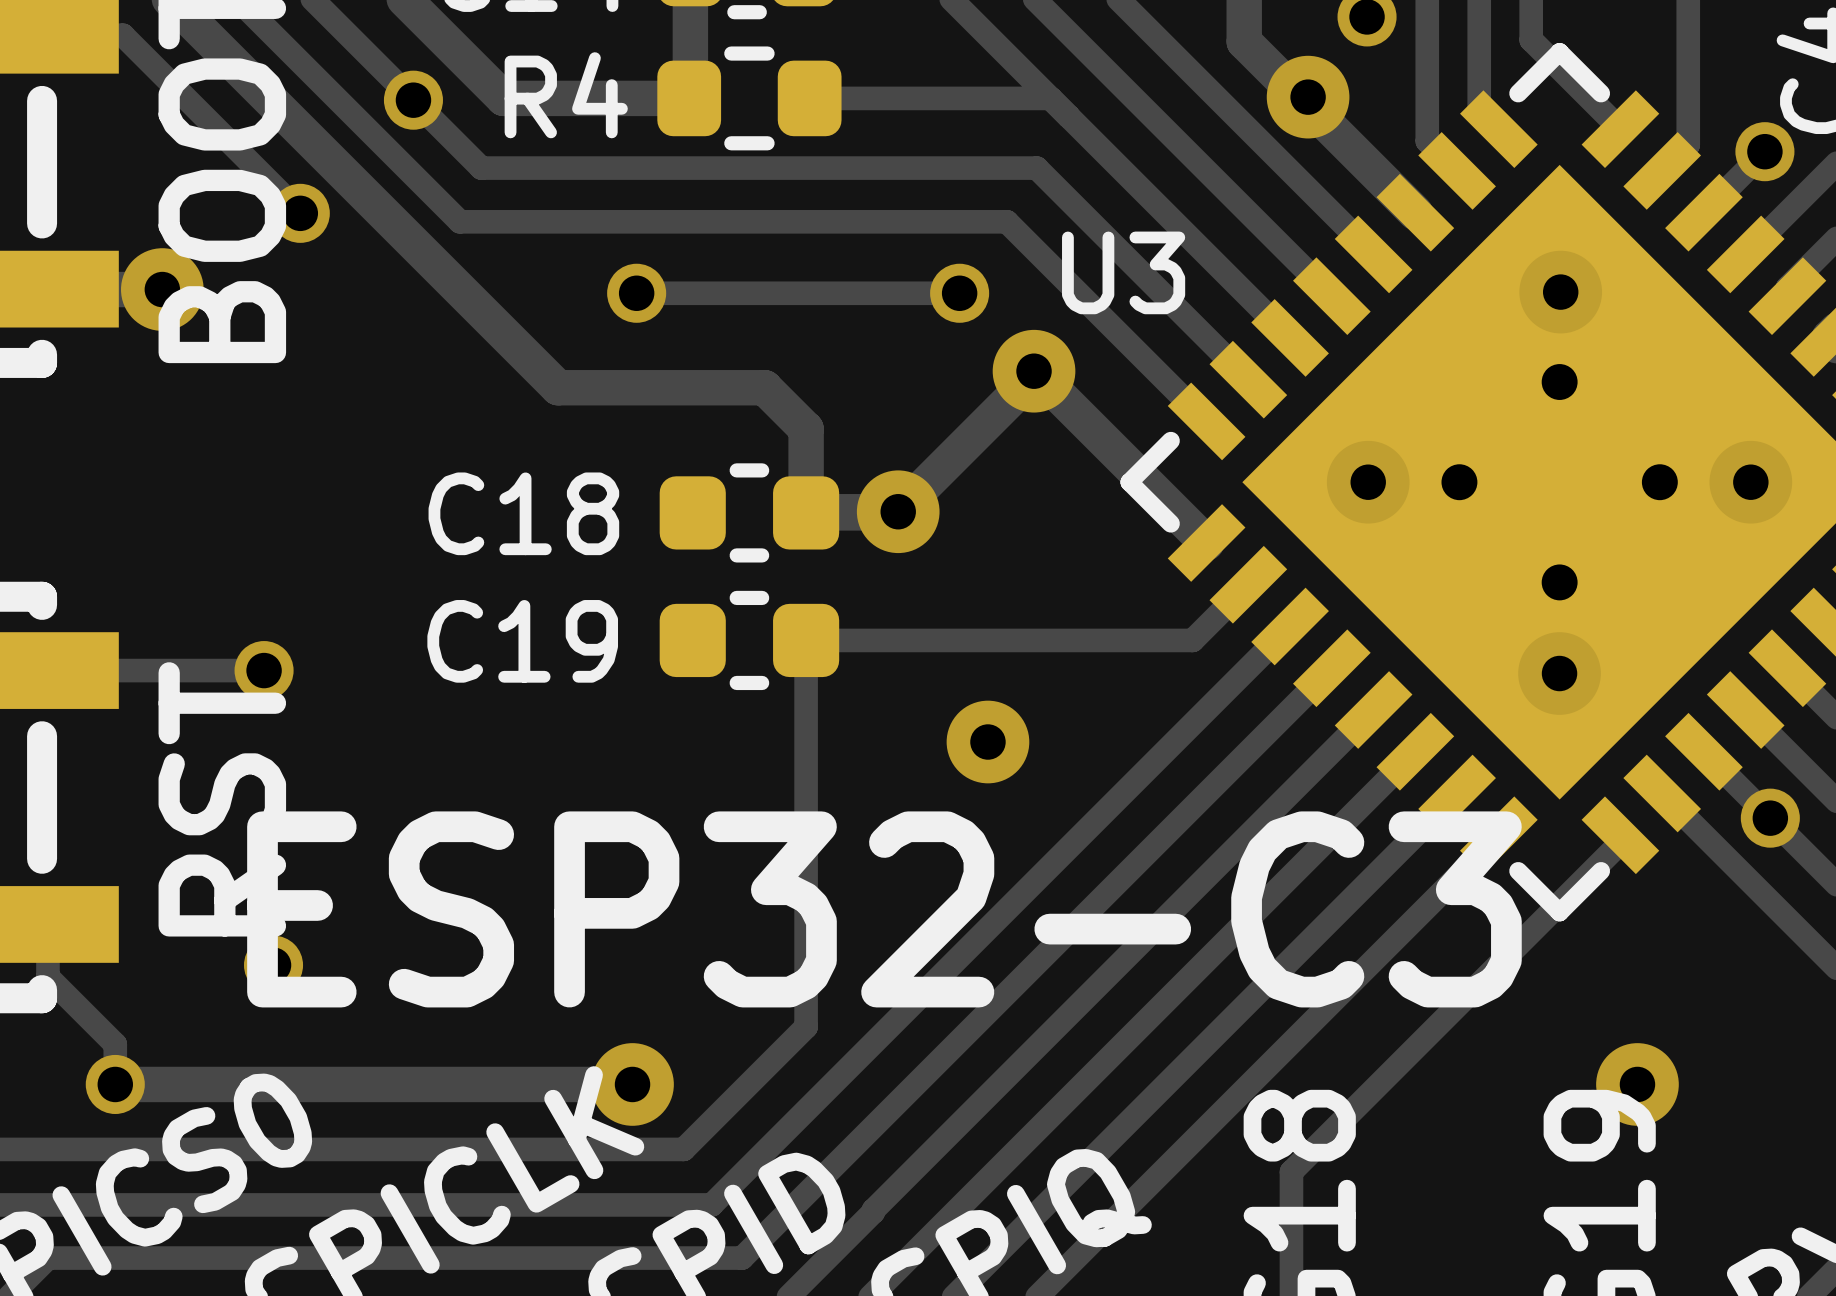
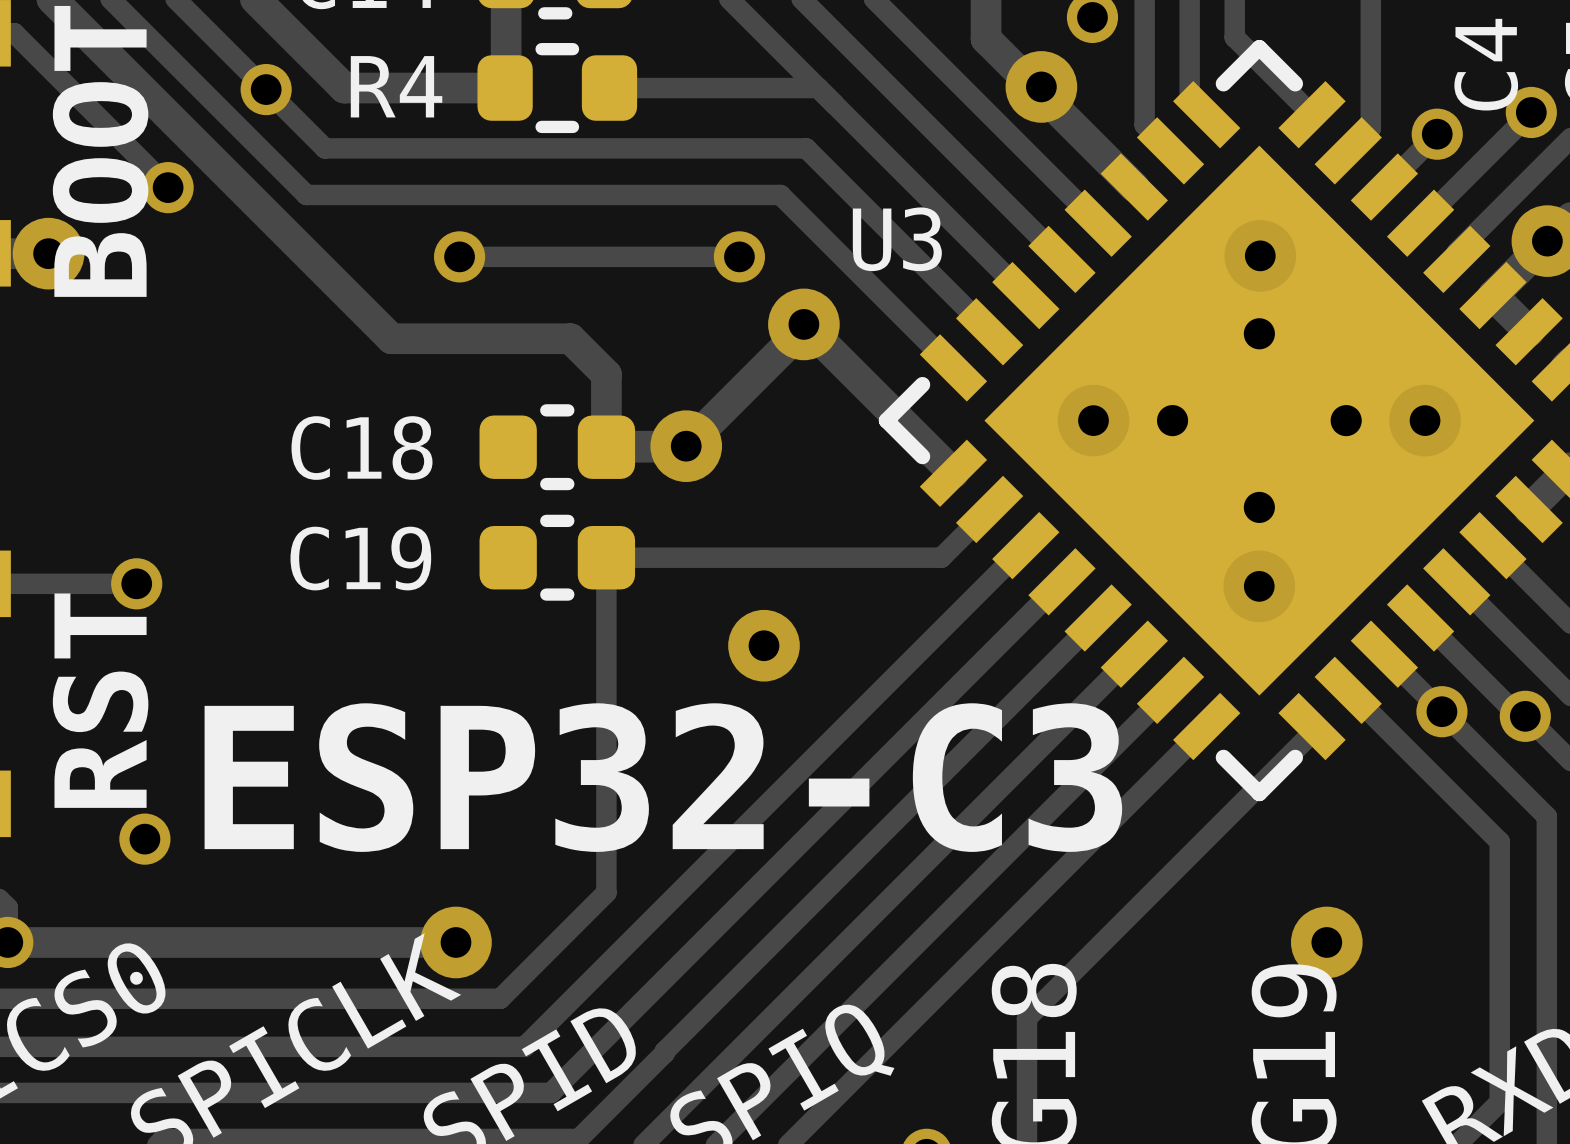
text position: ESP32-C3 (884, 909) -> ESP32-C3 (663, 777)

